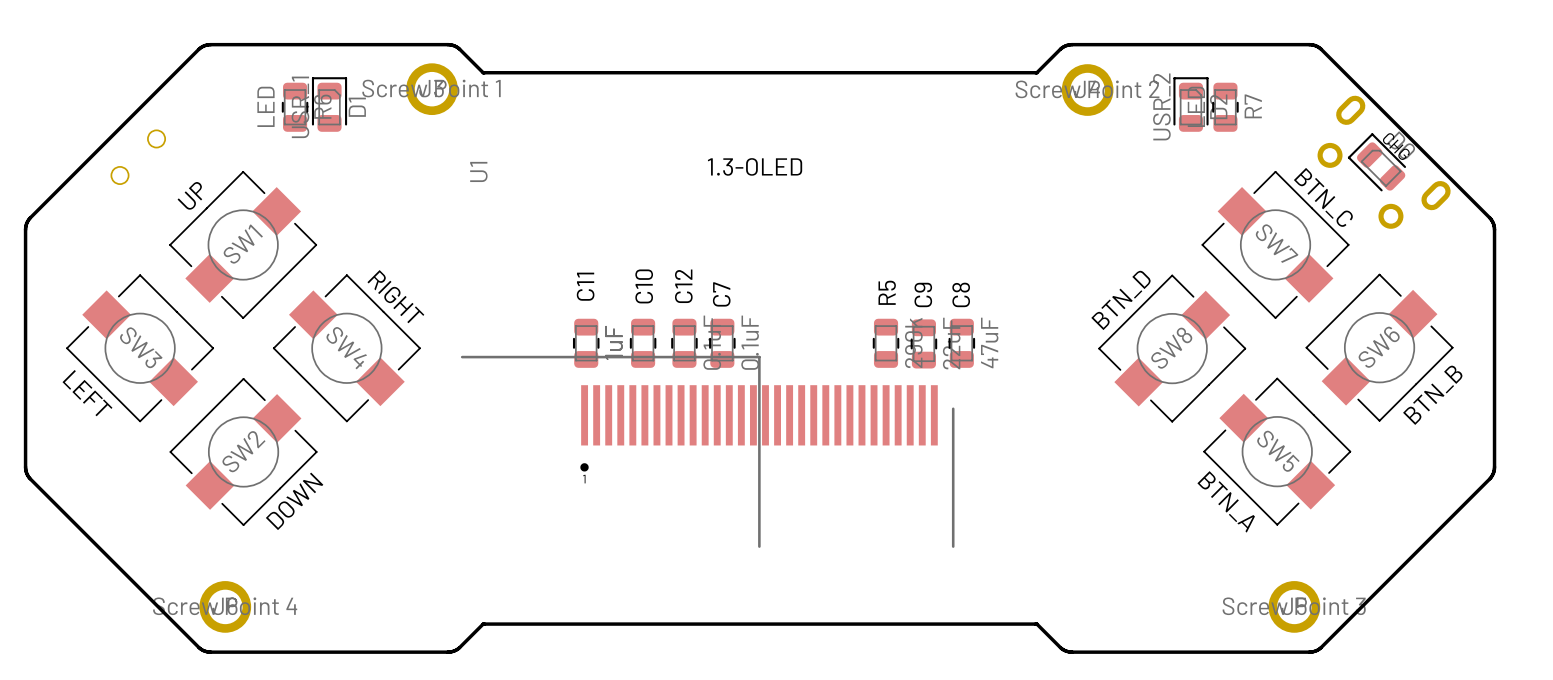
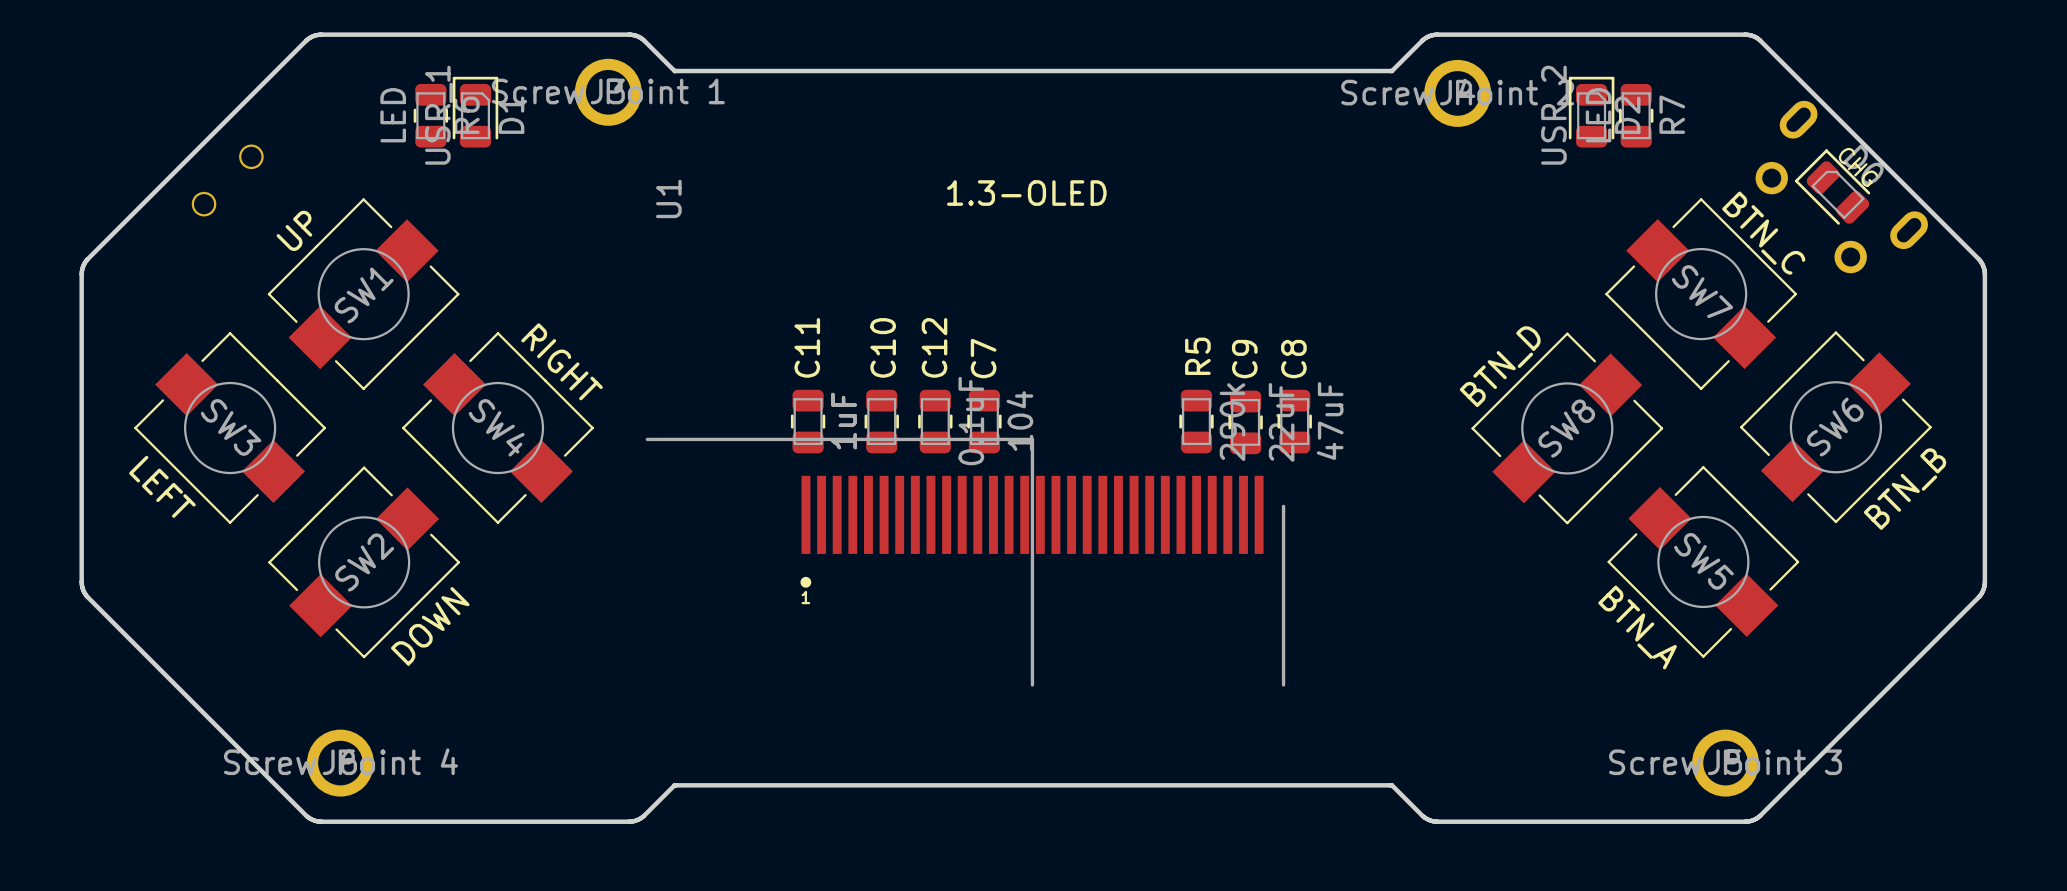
C7 value: 0.1uF (750, 342) -> 104 (1019, 421)

